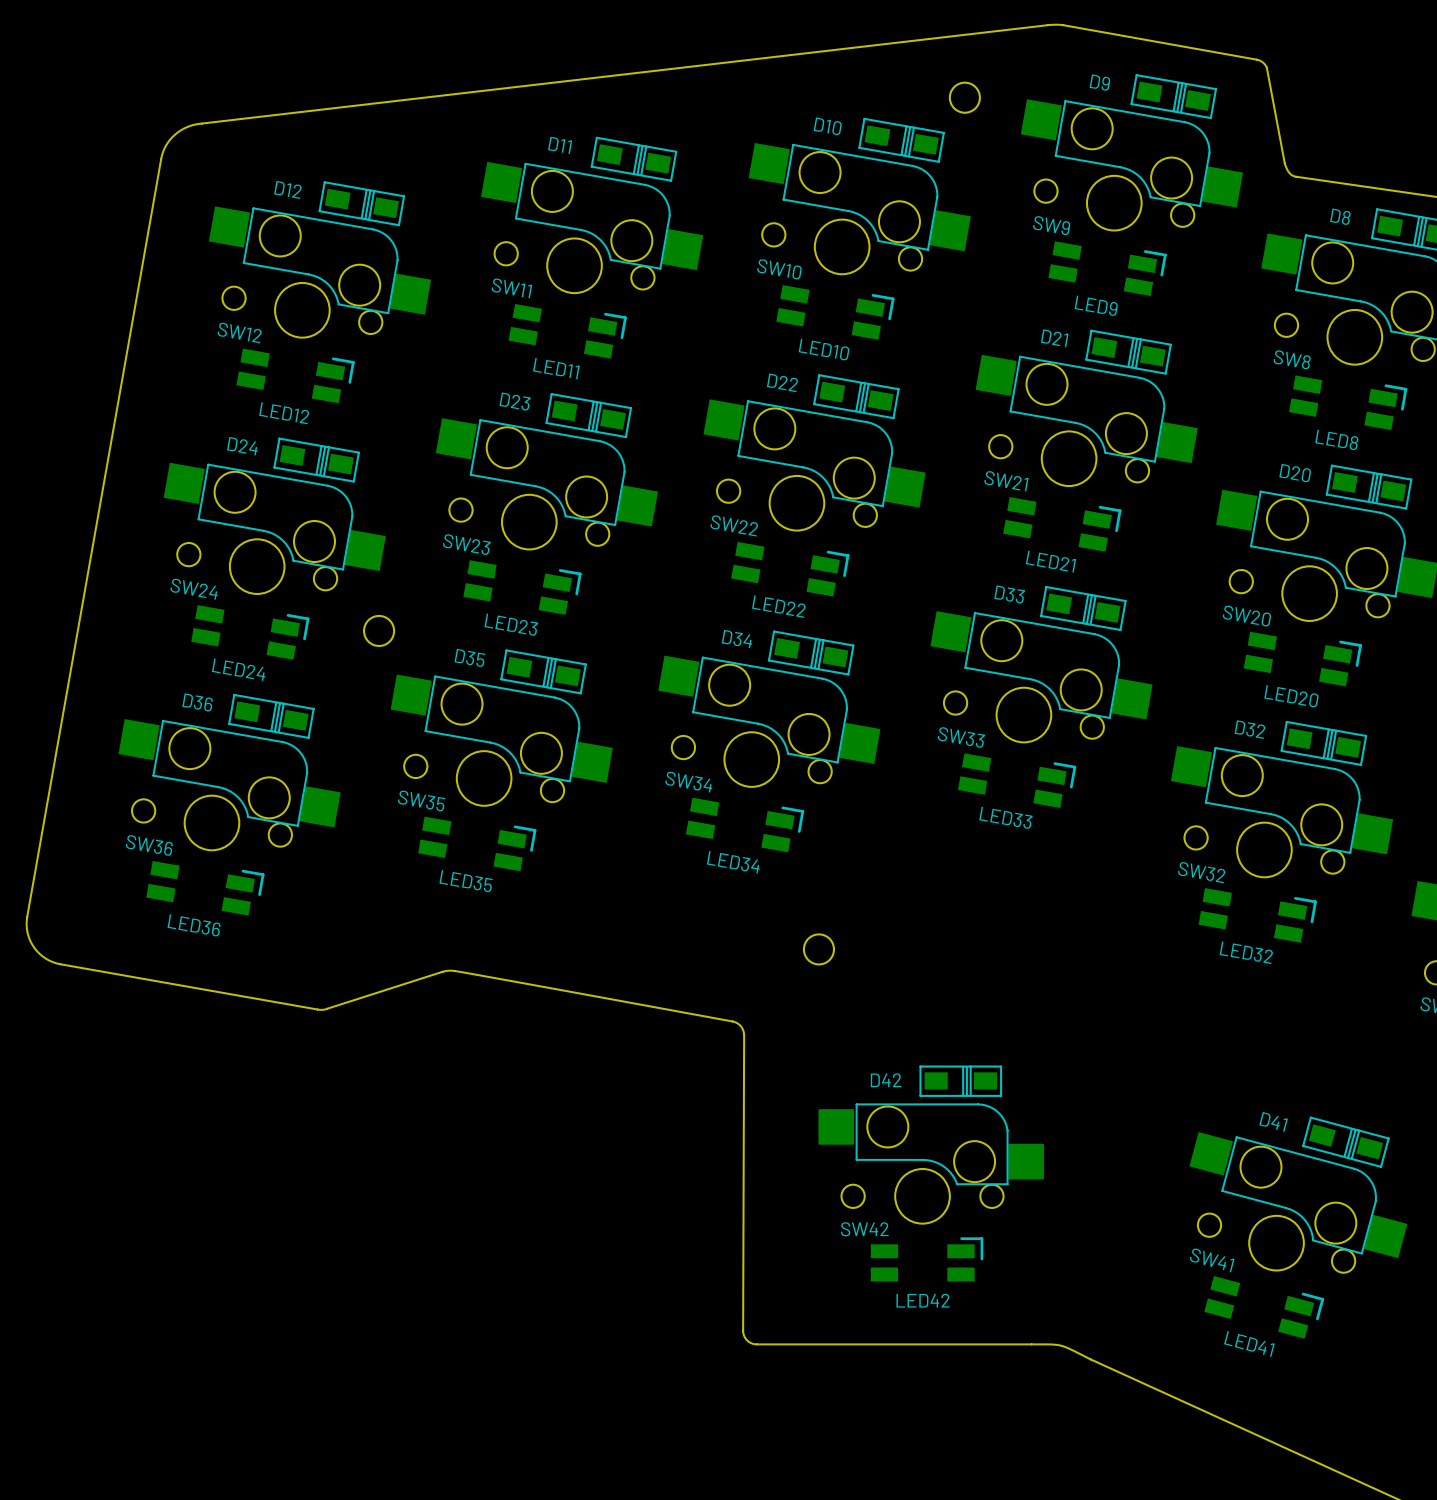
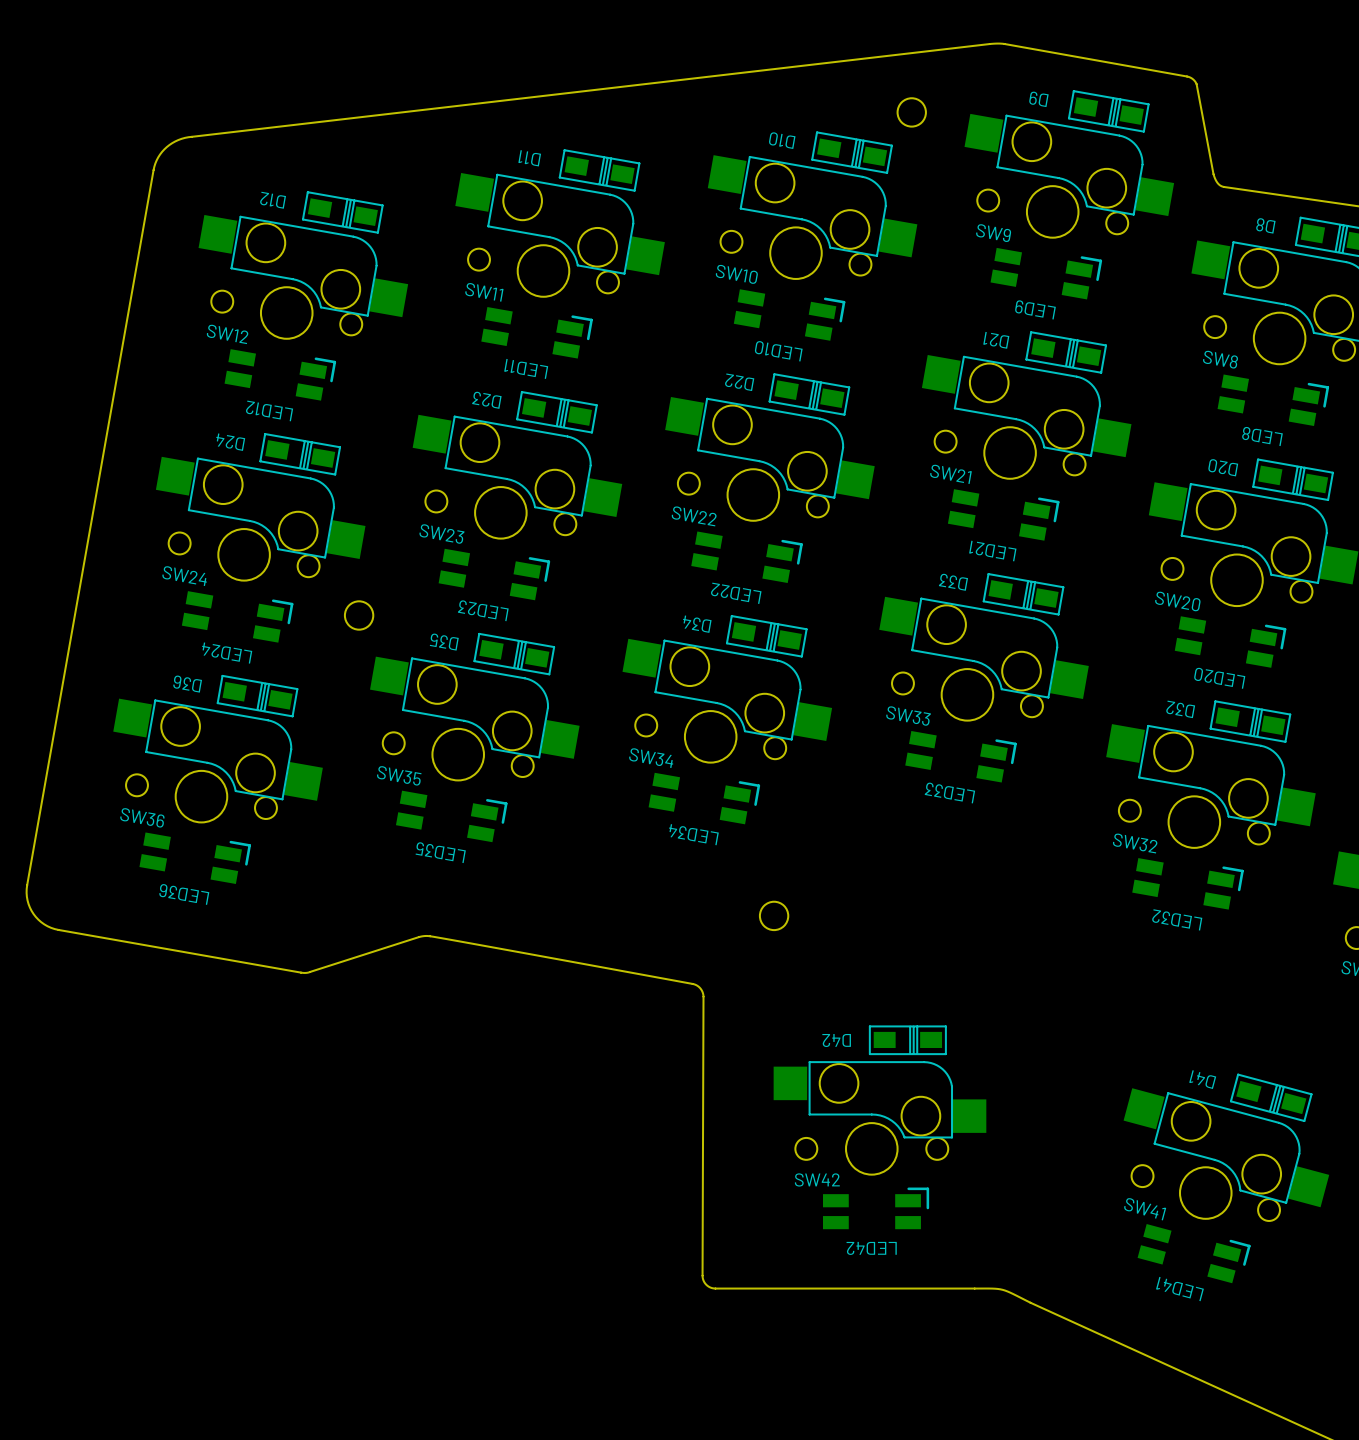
D9 name rotation: 0° (1099, 82) -> 180° (1038, 99)
D10 name rotation: 0° (827, 126) -> 180° (782, 140)
D11 name rotation: 0° (560, 145) -> 180° (529, 158)
D12 name rotation: 0° (287, 189) -> 180° (273, 200)
D8 name rotation: 0° (1340, 216) -> 180° (1265, 225)
LED9 name rotation: 0° (1096, 305) -> 180° (1035, 309)
D21 name rotation: 0° (1054, 338) -> 180° (996, 340)
LED10 name rotation: 0° (824, 349) -> 180° (778, 351)
LED11 name rotation: 0° (556, 368) -> 180° (526, 368)
D22 name rotation: 0° (782, 382) -> 180° (739, 382)
D23 name rotation: 0° (515, 401) -> 180° (486, 400)
LED12 name rotation: 0° (284, 413) -> 180° (269, 410)
LED8 name rotation: 0° (1336, 439) -> 180° (1262, 436)
D24 name rotation: 0° (242, 446) -> 180° (230, 442)
D20 name rotation: 0° (1295, 473) -> 180° (1223, 467)
LED21 name rotation: 0° (1051, 561) -> 180° (992, 551)
D33 name rotation: 0° (1009, 594) -> 180° (953, 582)
LED22 name rotation: 0° (778, 606) -> 180° (736, 593)
LED23 name rotation: 0° (511, 624) -> 180° (483, 610)
D34 name rotation: 0° (736, 639) -> 180° (697, 624)
D35 name rotation: 0° (469, 657) -> 180° (444, 642)
LED24 name rotation: 0° (238, 669) -> 180° (227, 653)
LED20 name rotation: 0° (1291, 696) -> 180° (1219, 678)
D36 name rotation: 0° (197, 702) -> 180° (187, 684)
D32 name rotation: 0° (1249, 729) -> 180° (1180, 709)
LED33 name rotation: 0° (1006, 817) -> 180° (949, 792)
LED34 name rotation: 0° (733, 862) -> 180° (693, 834)
LED35 name rotation: 0° (466, 881) -> 180° (440, 852)
LED36 name rotation: 0° (194, 925) -> 180° (184, 894)
LED32 name rotation: 0° (1246, 952) -> 180° (1177, 919)
D42 name rotation: 0° (885, 1080) -> 180° (836, 1040)
D41 name rotation: 0° (1273, 1121) -> 180° (1202, 1079)
LED42 name rotation: 0° (923, 1300) -> 180° (871, 1248)
LED41 name rotation: 0° (1249, 1343) -> 180° (1179, 1289)

